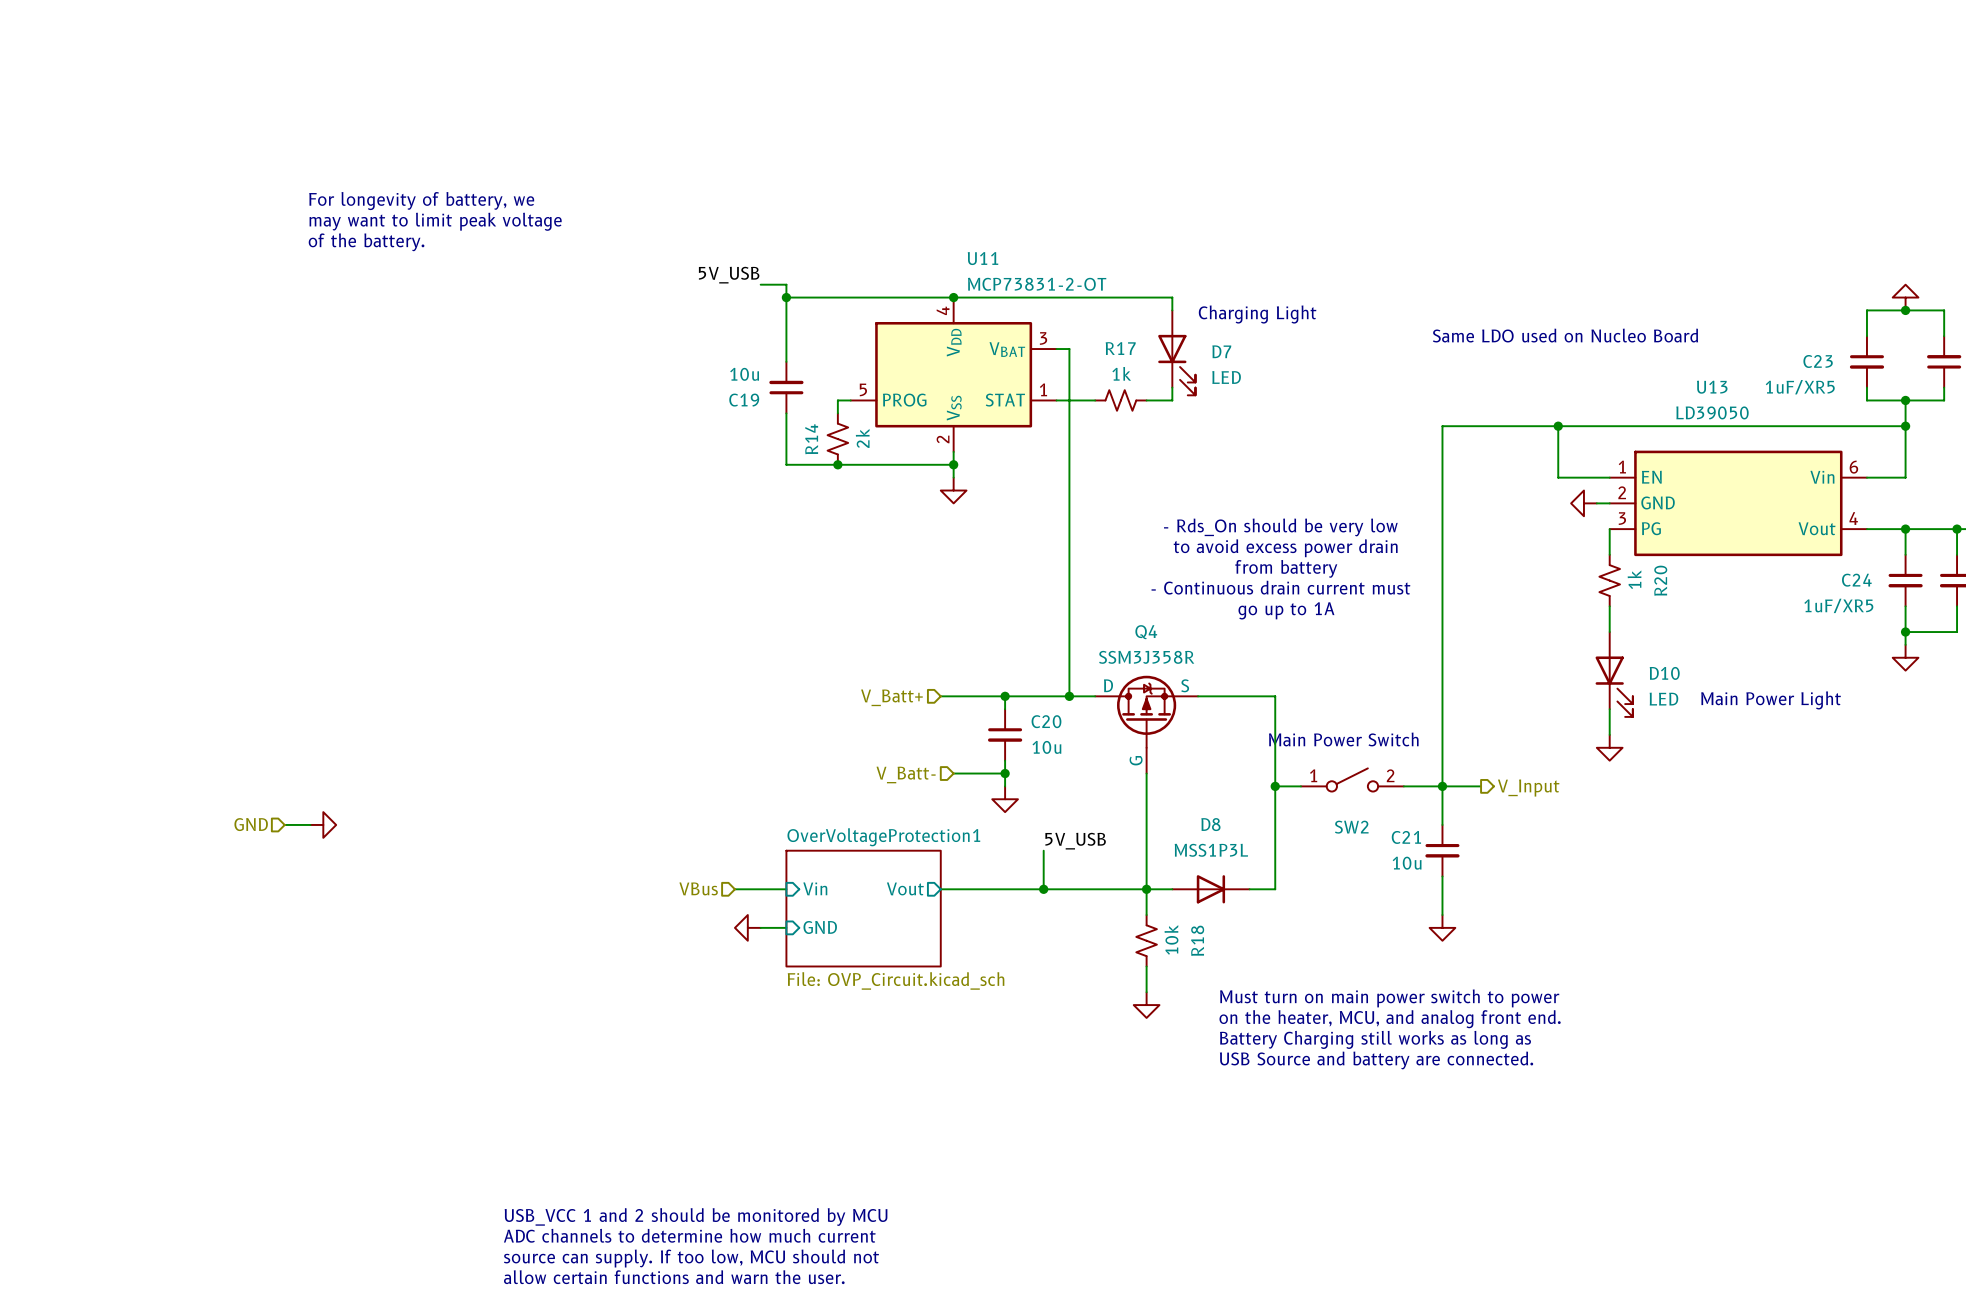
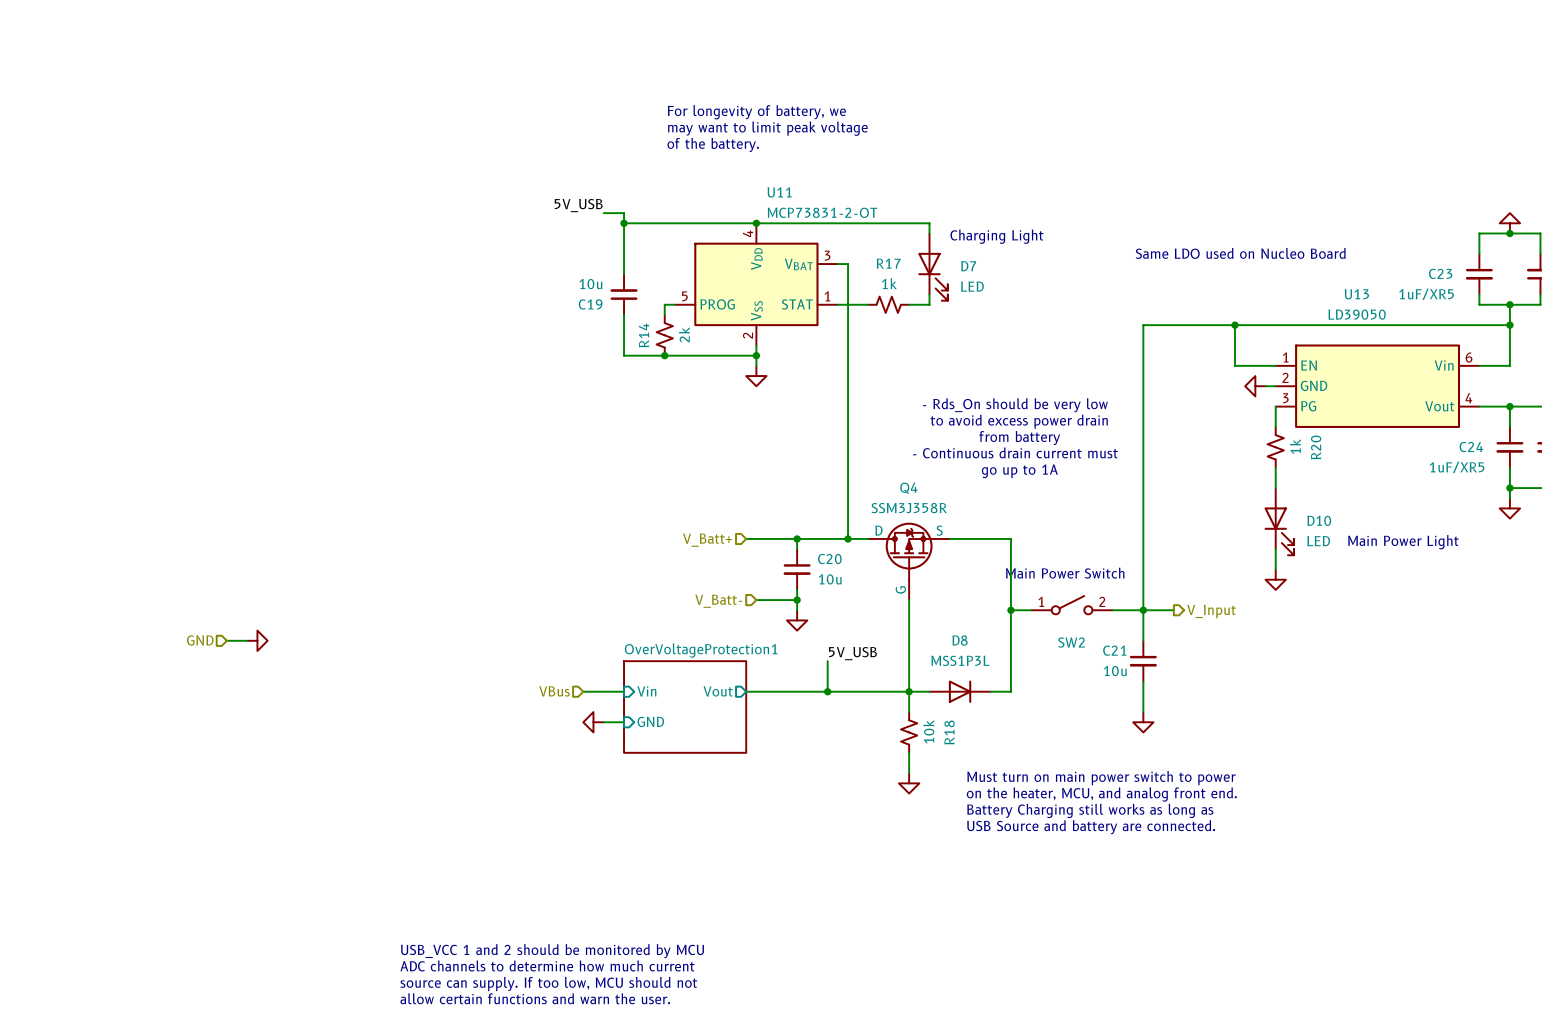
text: none -> For longevity of battery, we (756, 112)
text: none -> may want to limit peak voltage (767, 128)
text: none -> of the battery. (713, 144)
text: For longevity of battery, we (421, 201) -> none
text: may want to limit peak voltage (435, 221) -> none
text: of the battery. (366, 242) -> none
sheet OverVoltageProtection1 value: File: OVP_Circuit.kicad_sch (896, 980) -> none

